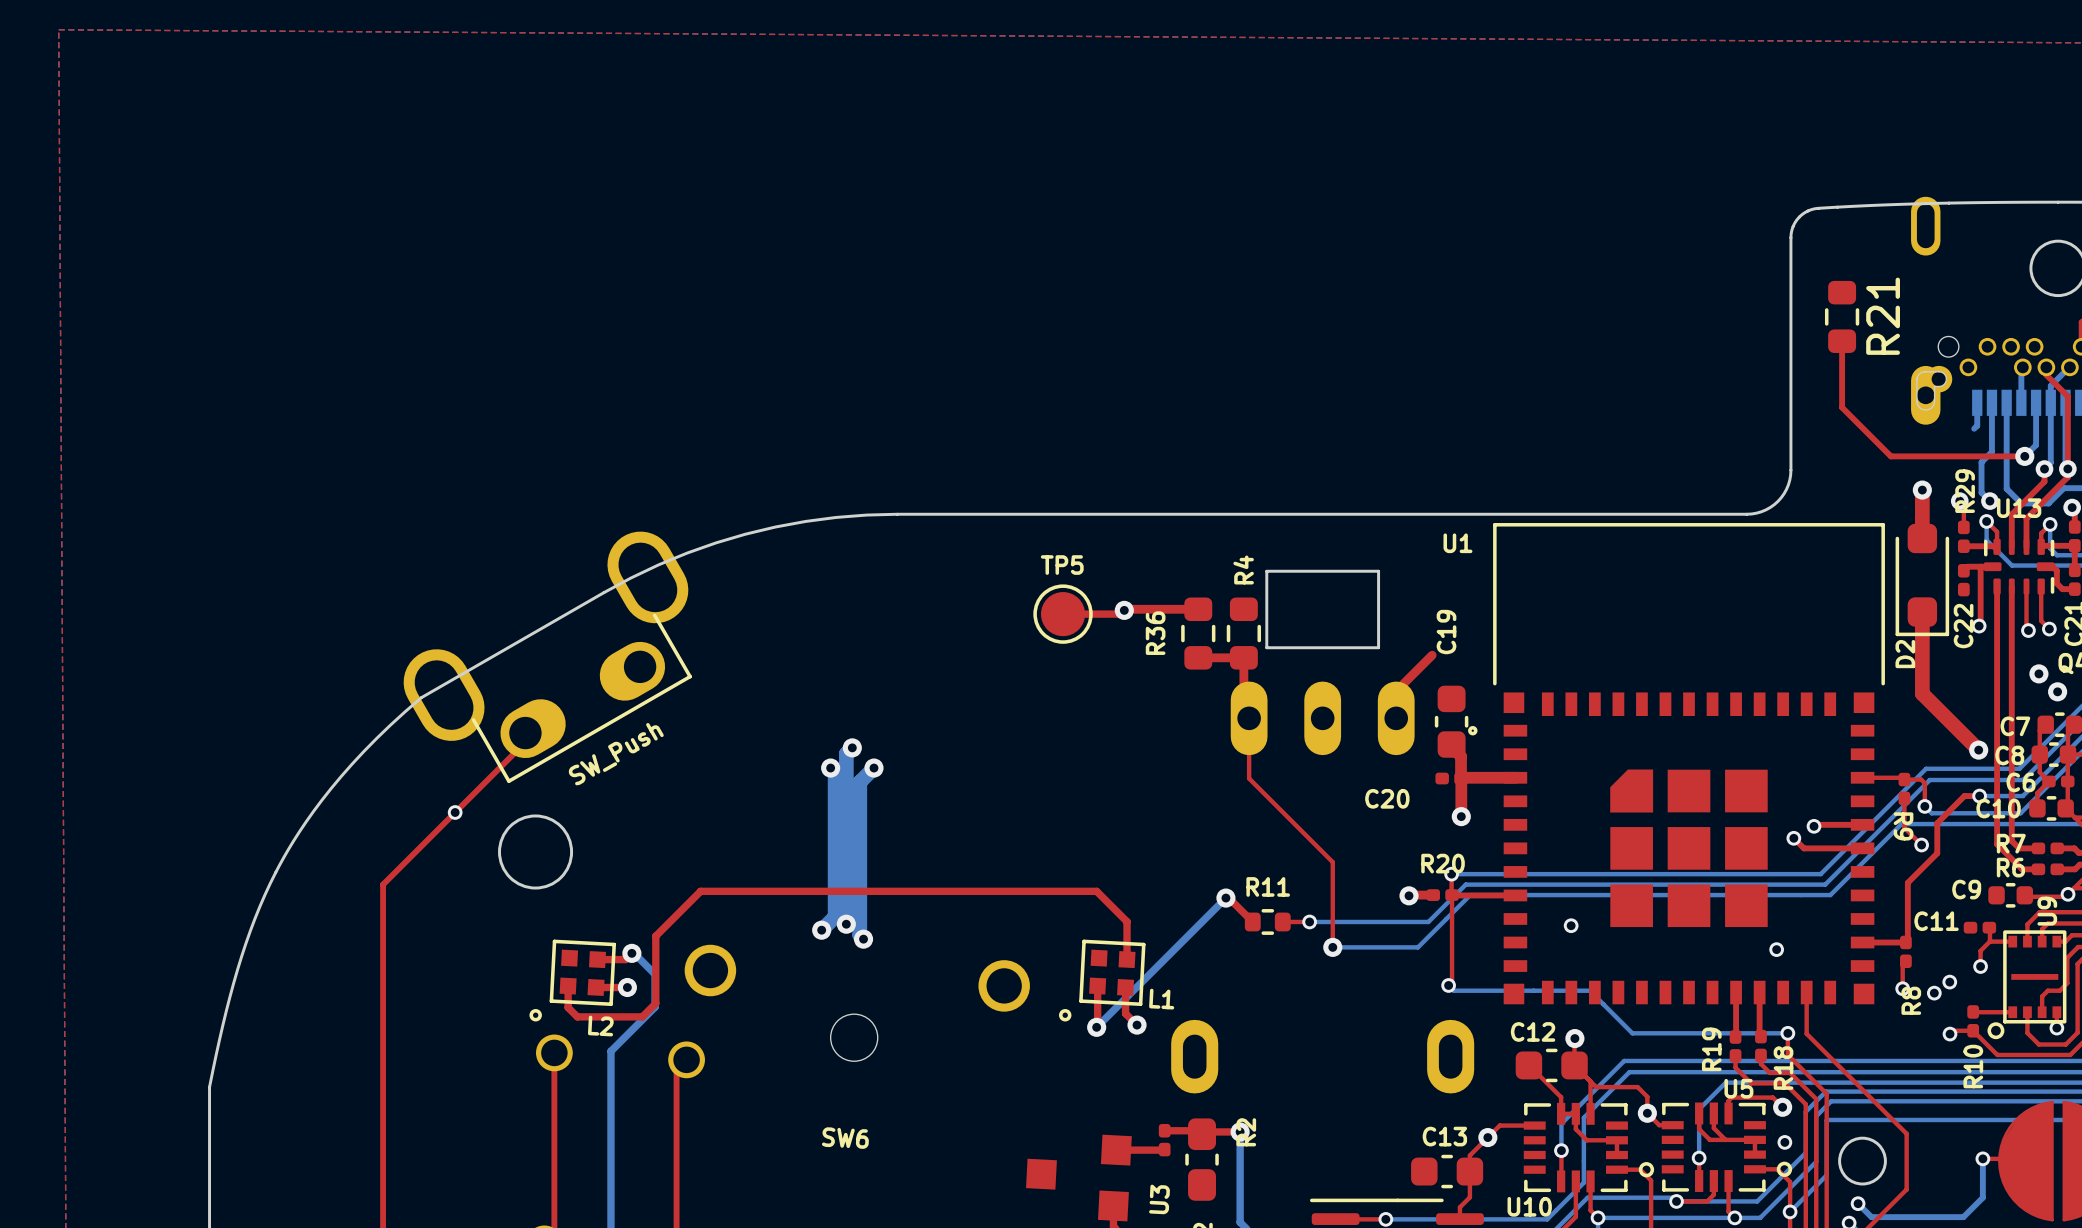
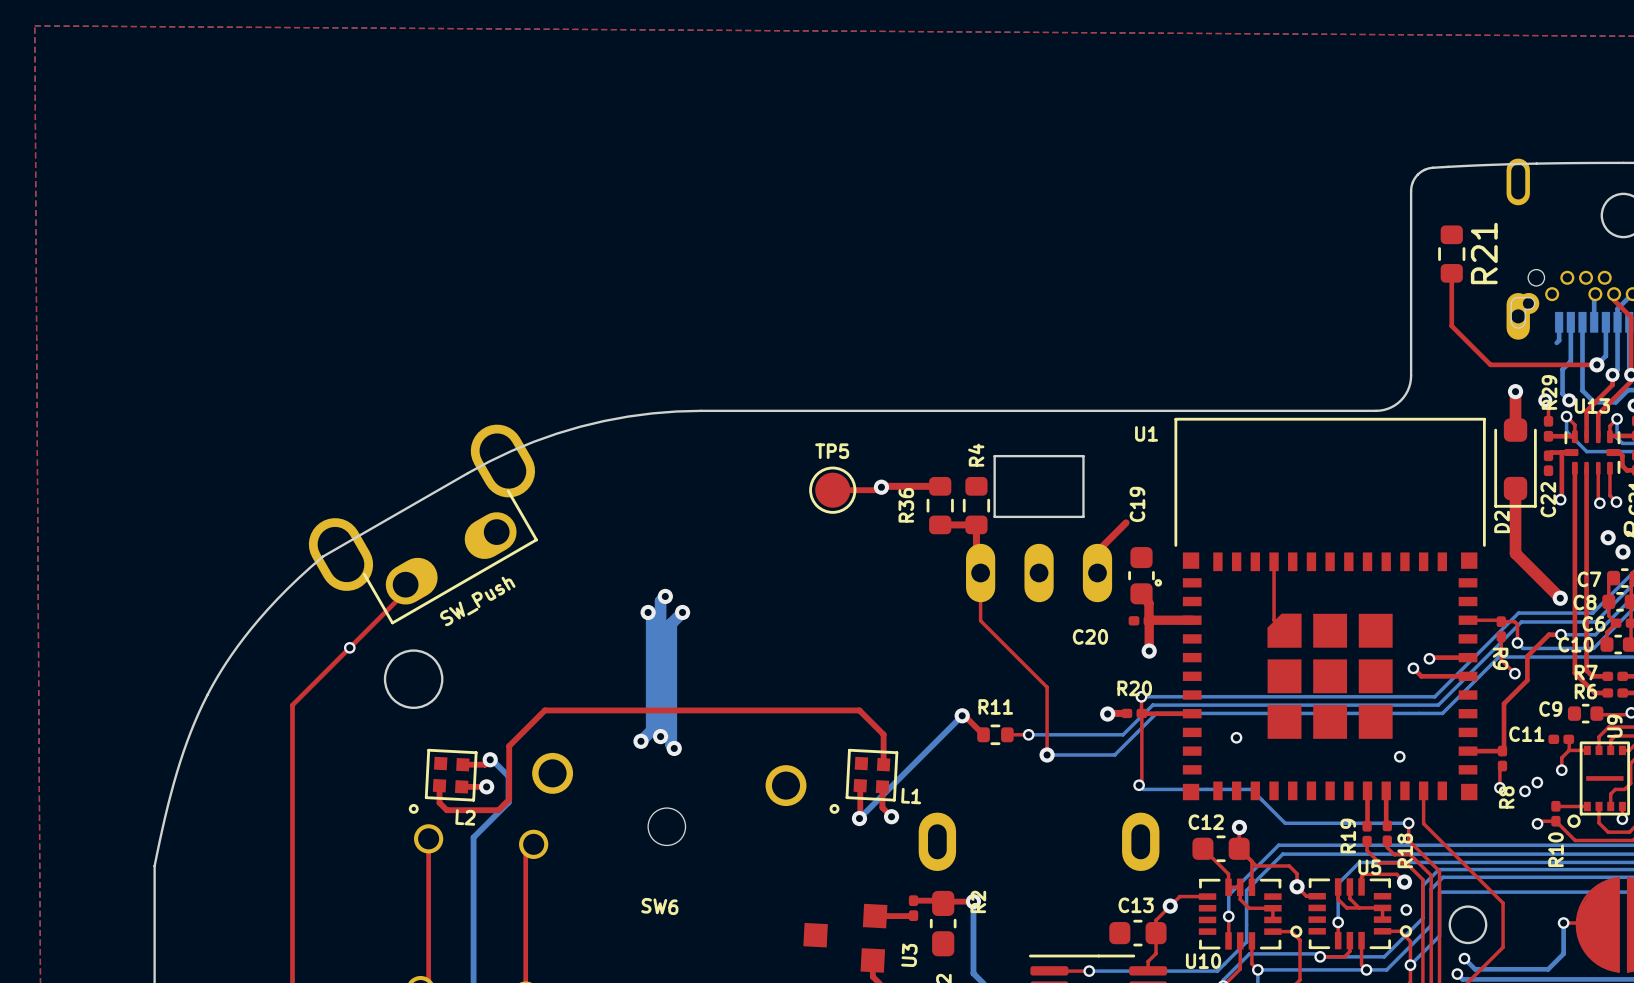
top track: none -> (1274, 561) (1274, 620) (1284, 630)

